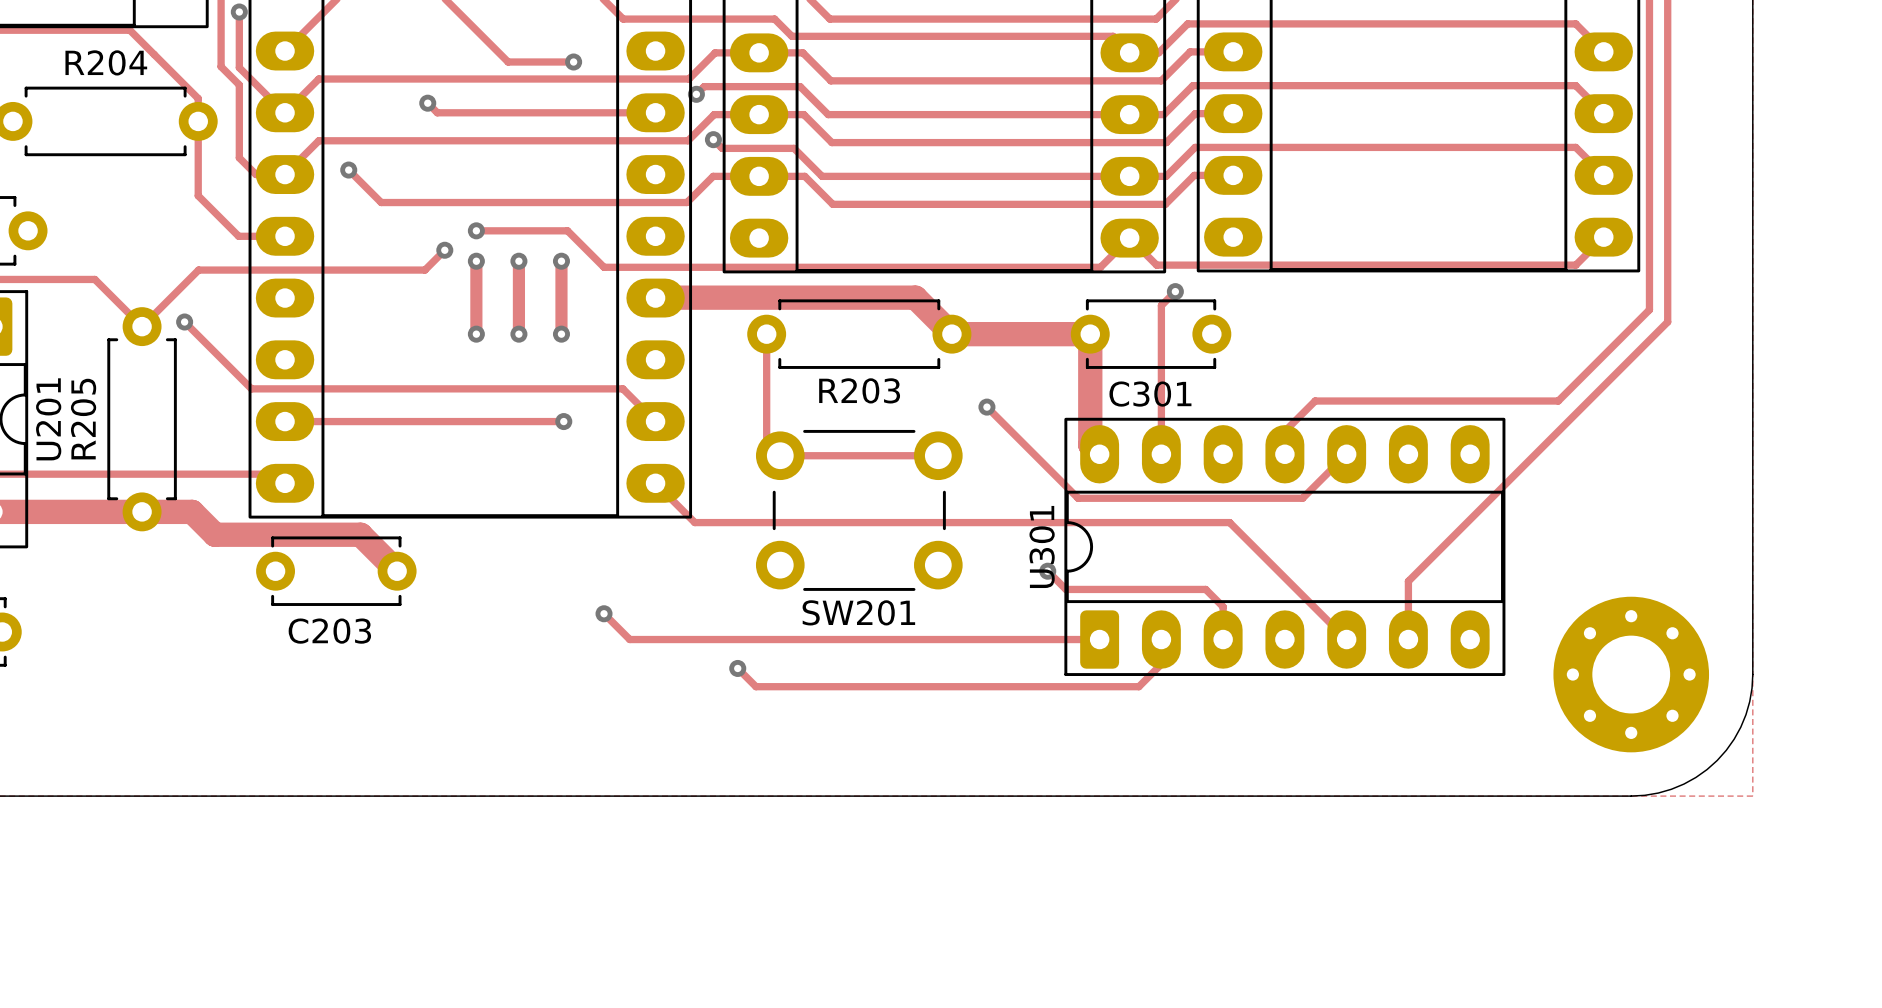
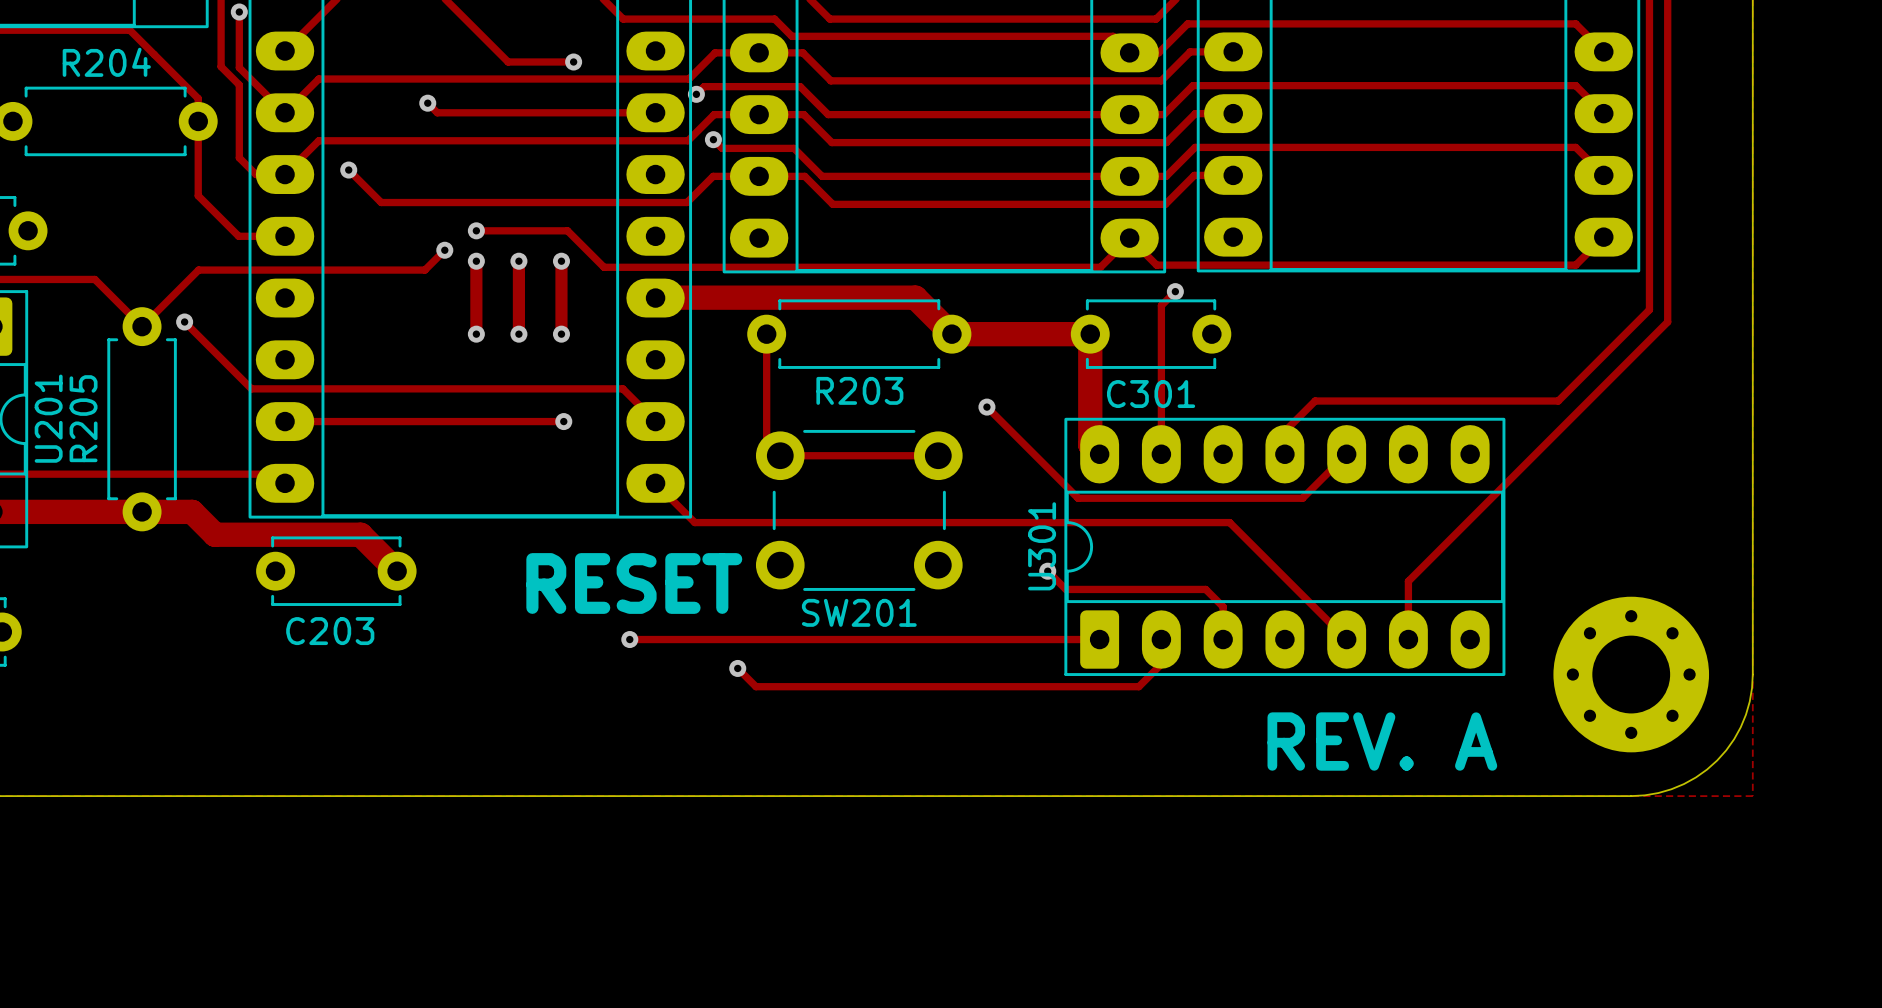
text: none -> RESET (634, 583)
track: (604, 613) (629, 639) -> none
via position: (604, 613) -> (629, 639)
text: none -> REV. A (1382, 741)

